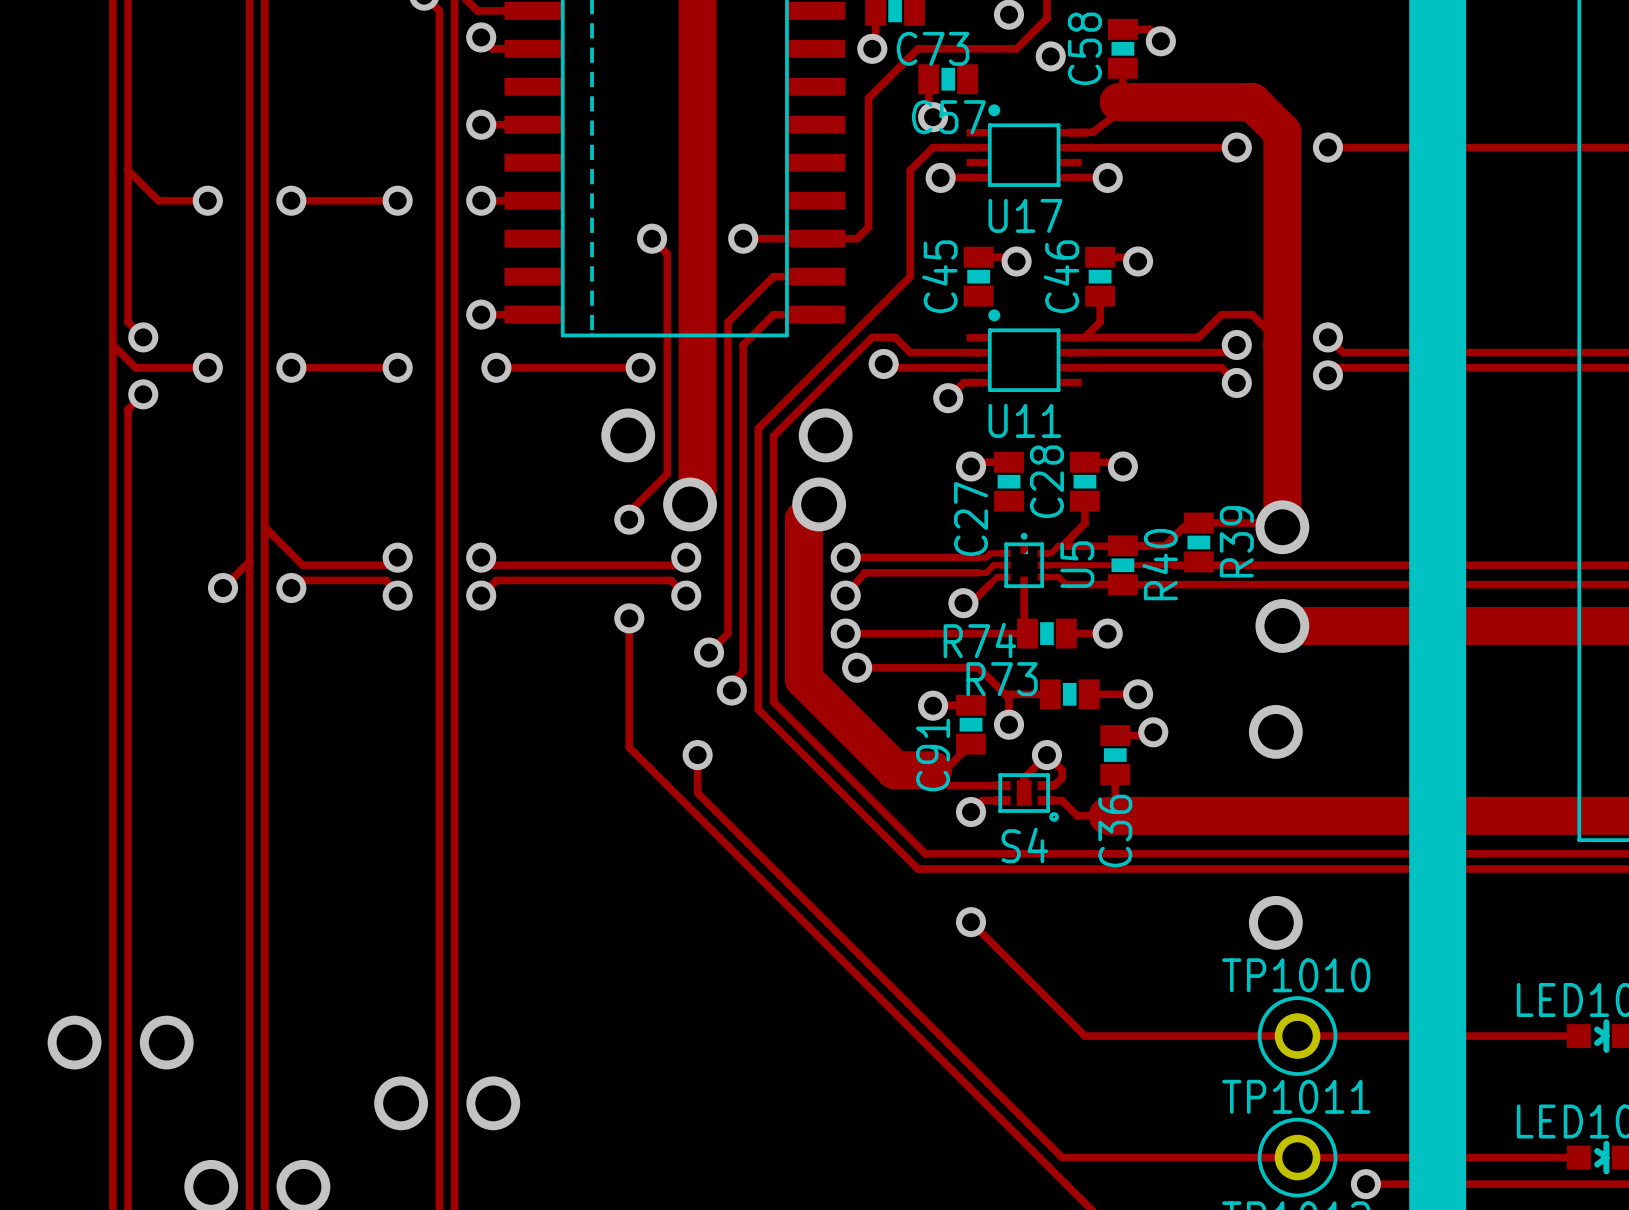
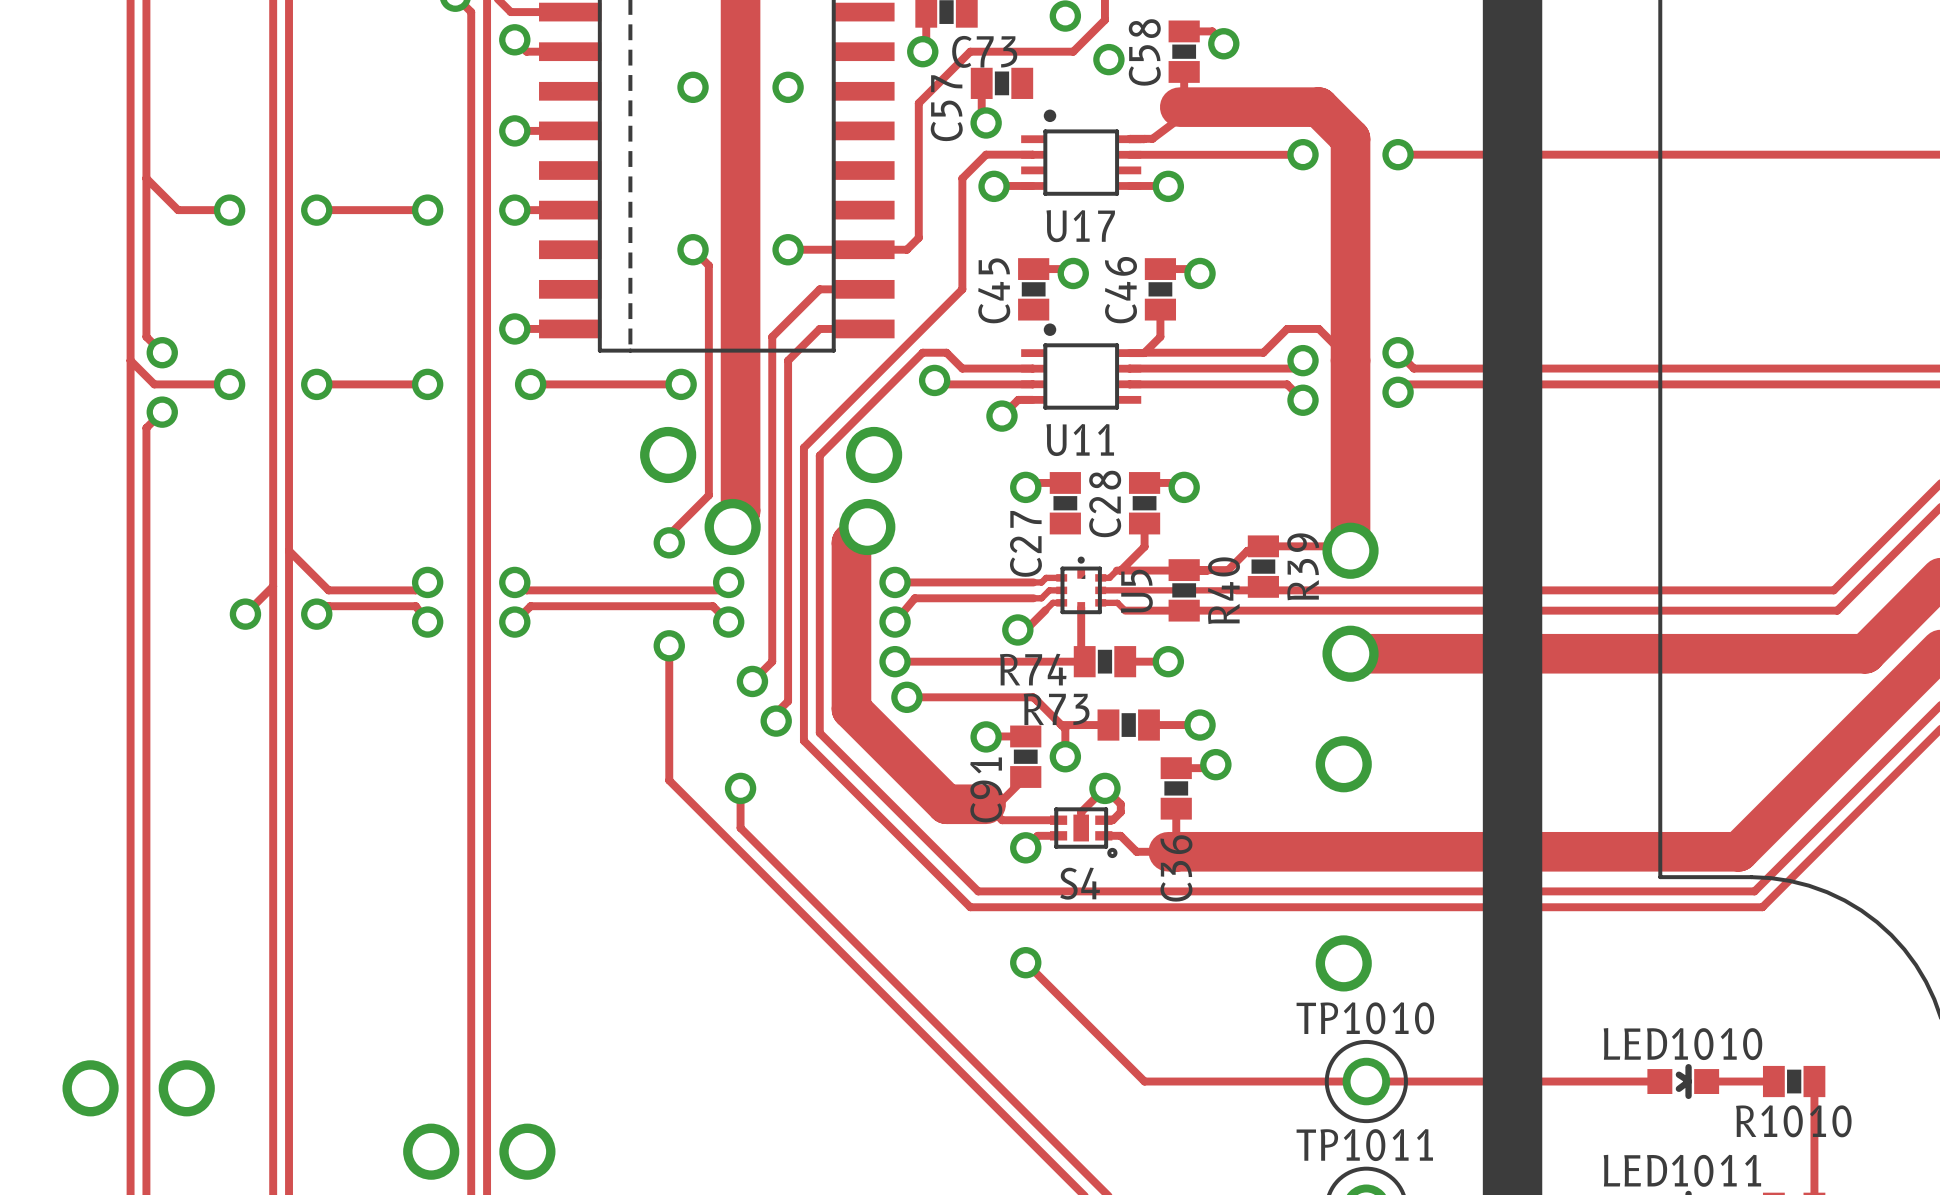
via: none -> (693, 87)
via: none -> (788, 87)
C57 name rotation: 0° (948, 117) -> 90° counterclockwise (946, 108)

